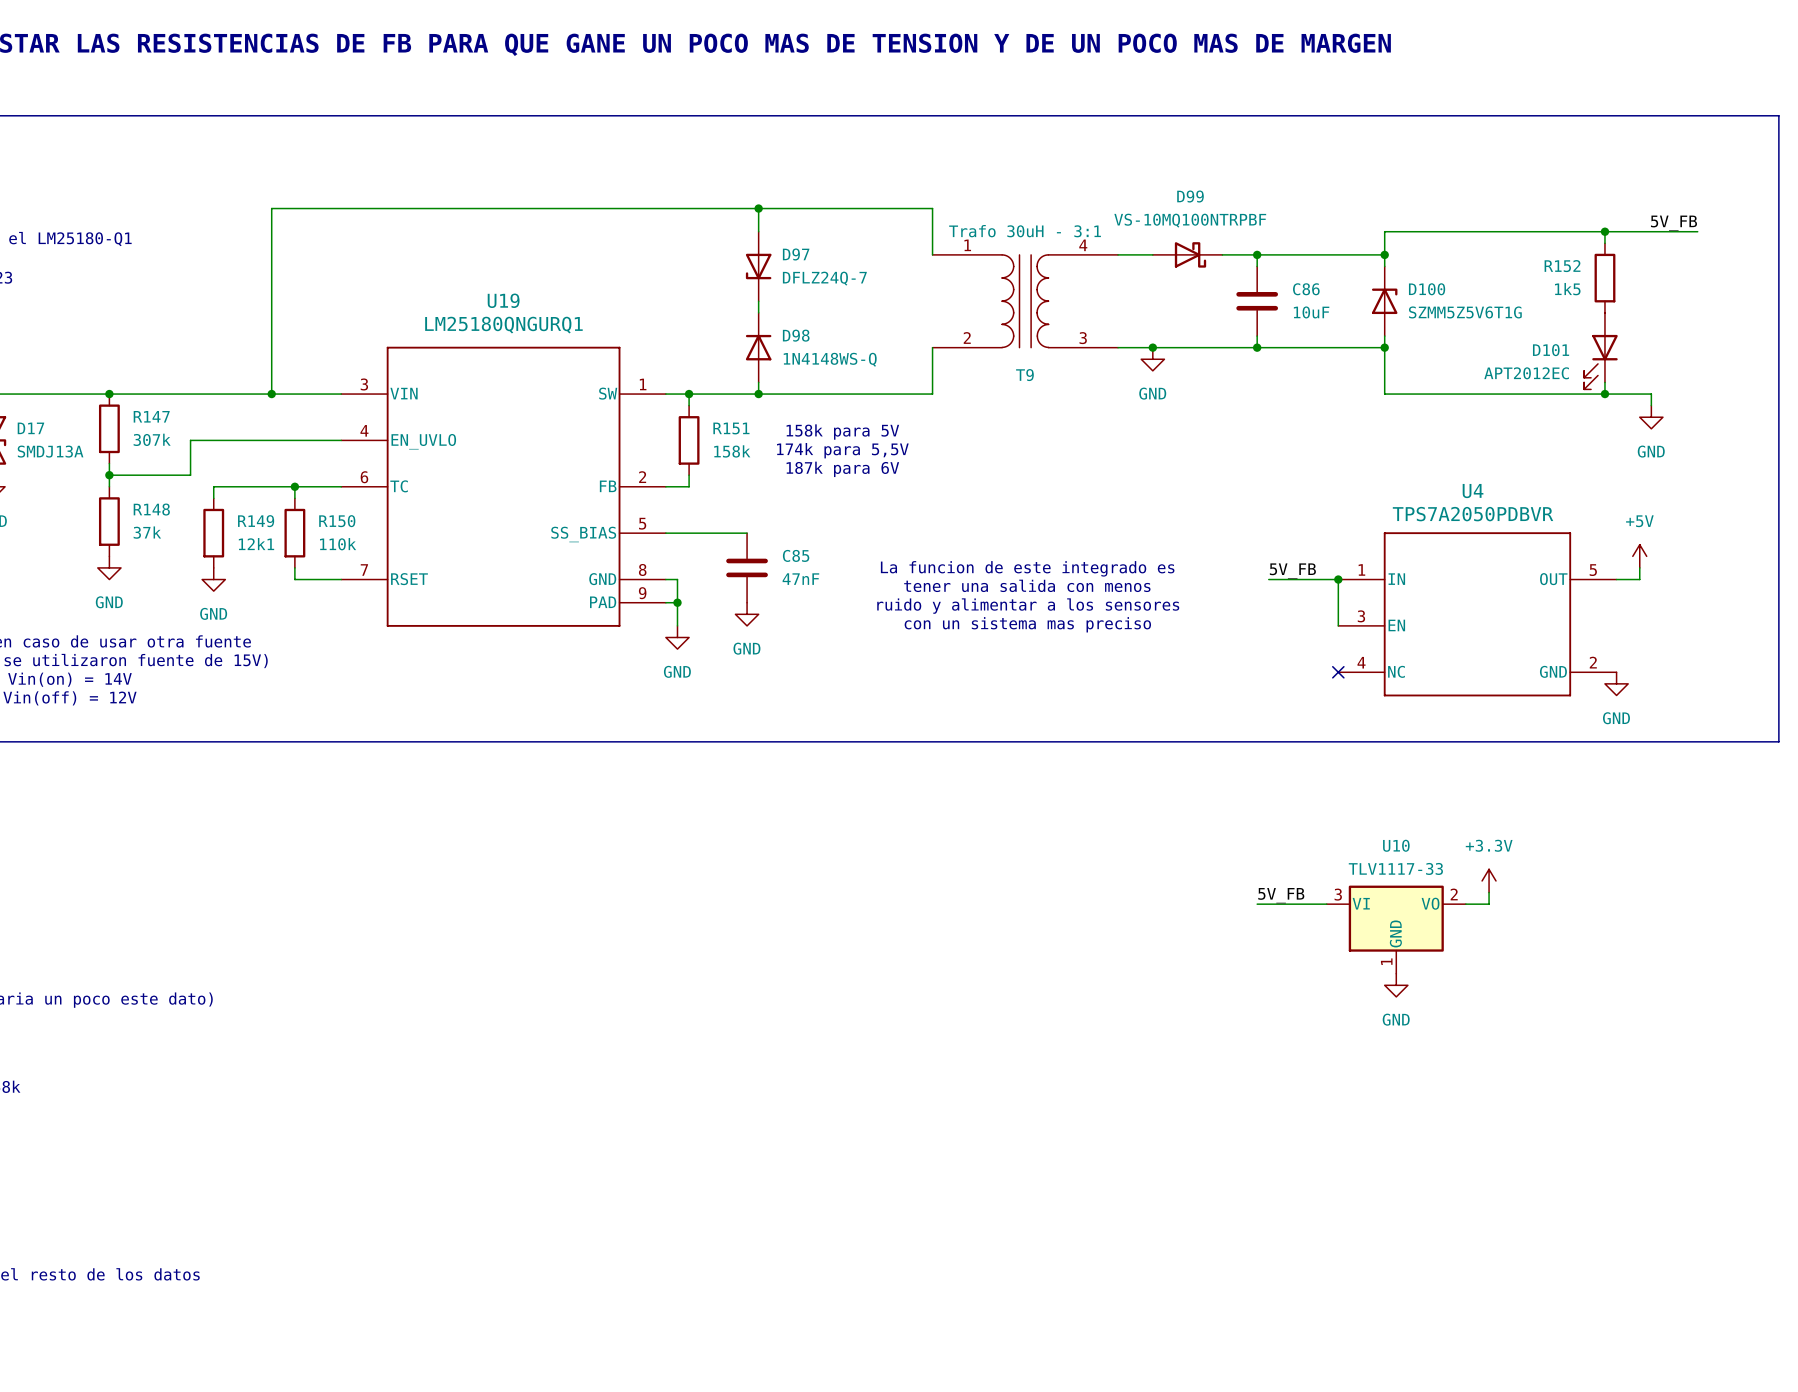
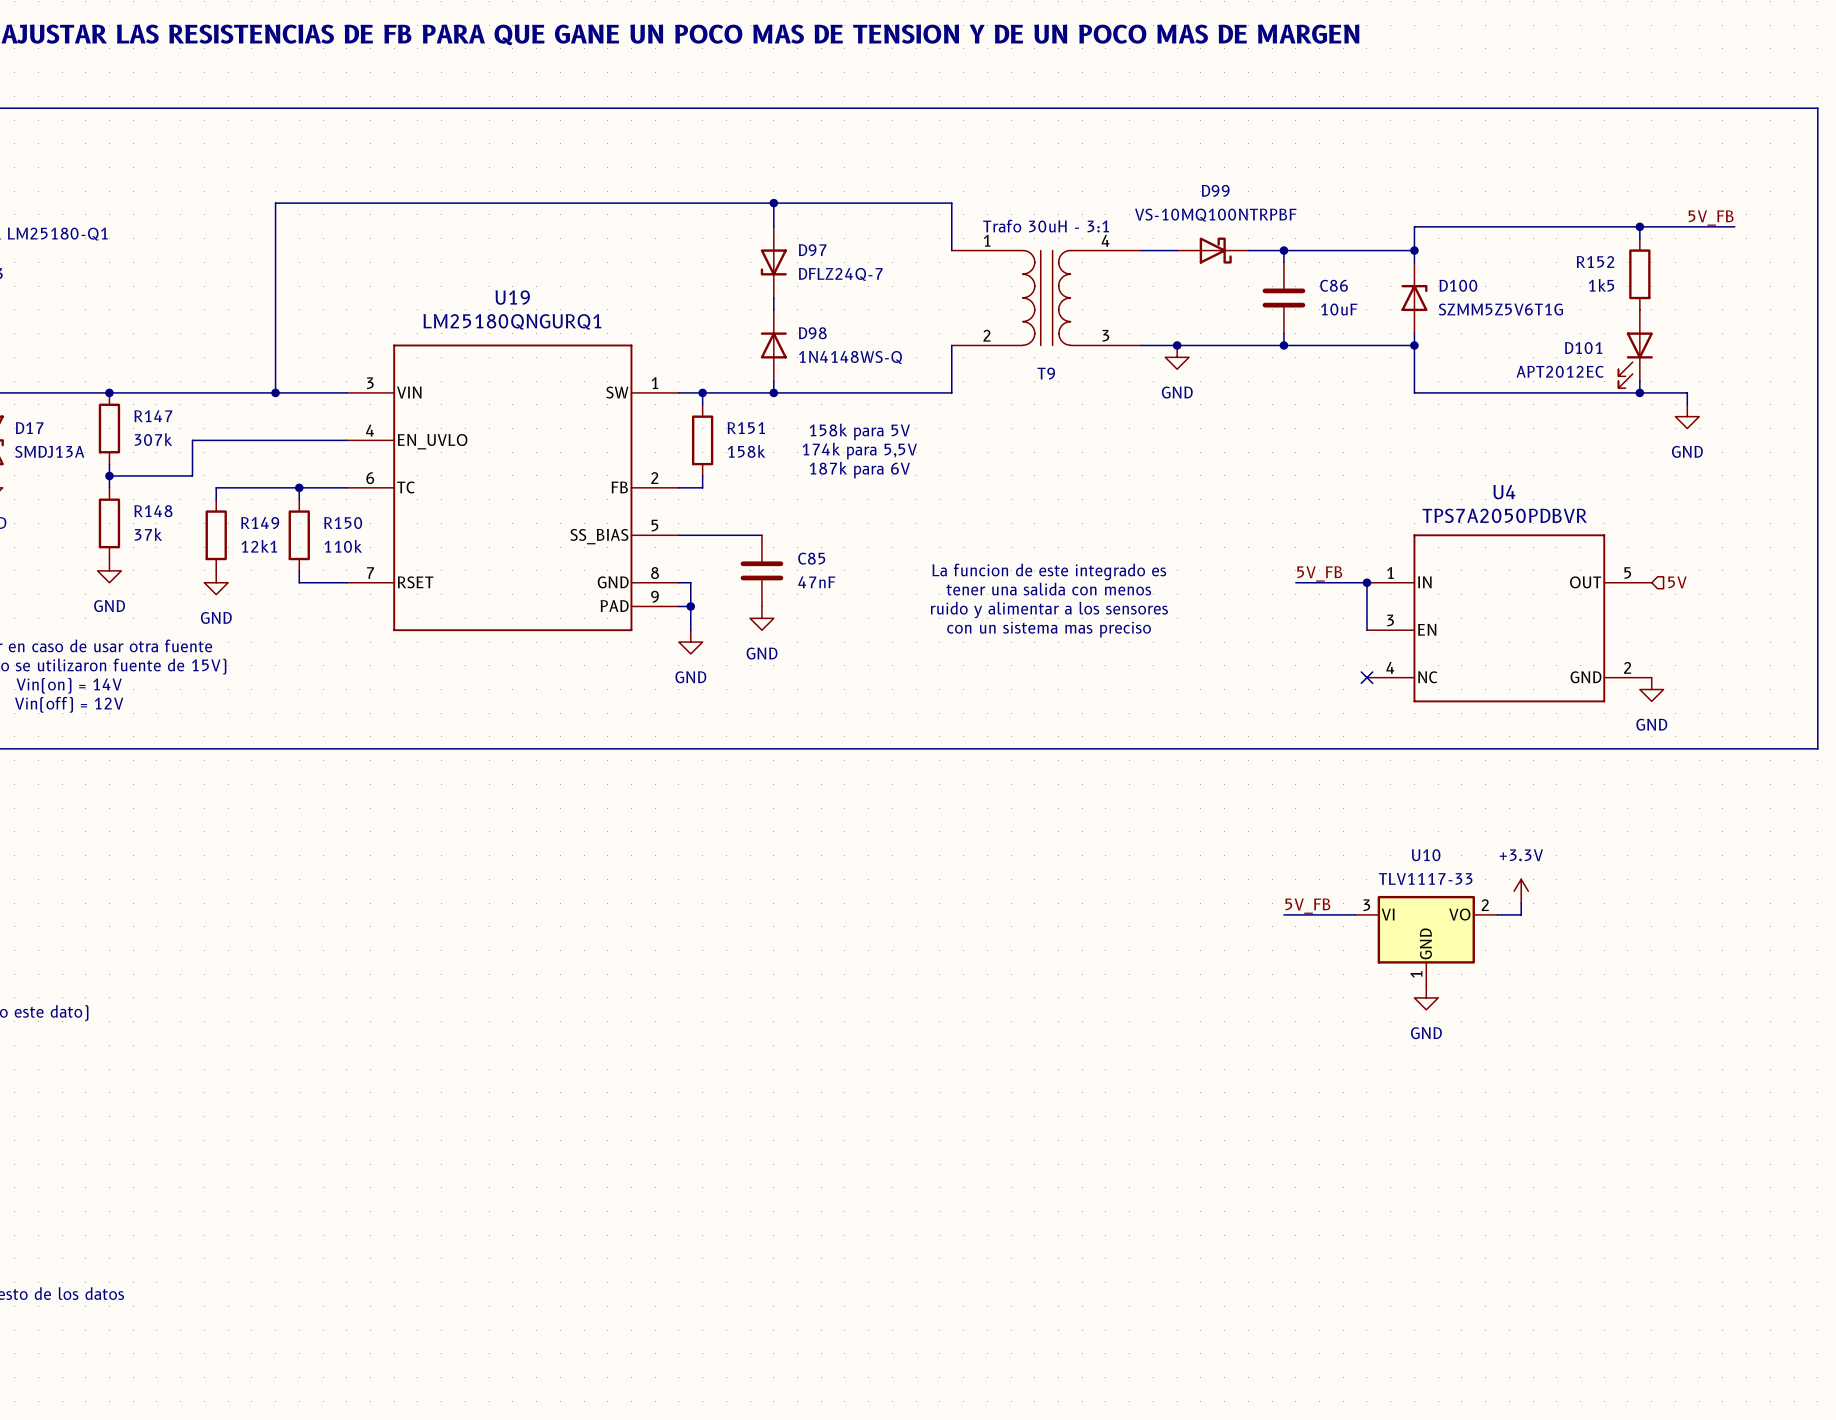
power symbol: +5V (1639, 556) -> none
wire: (1639, 567) (1639, 579) (1616, 579) -> none
hierarchical label: none -> 5V (1677, 582)

